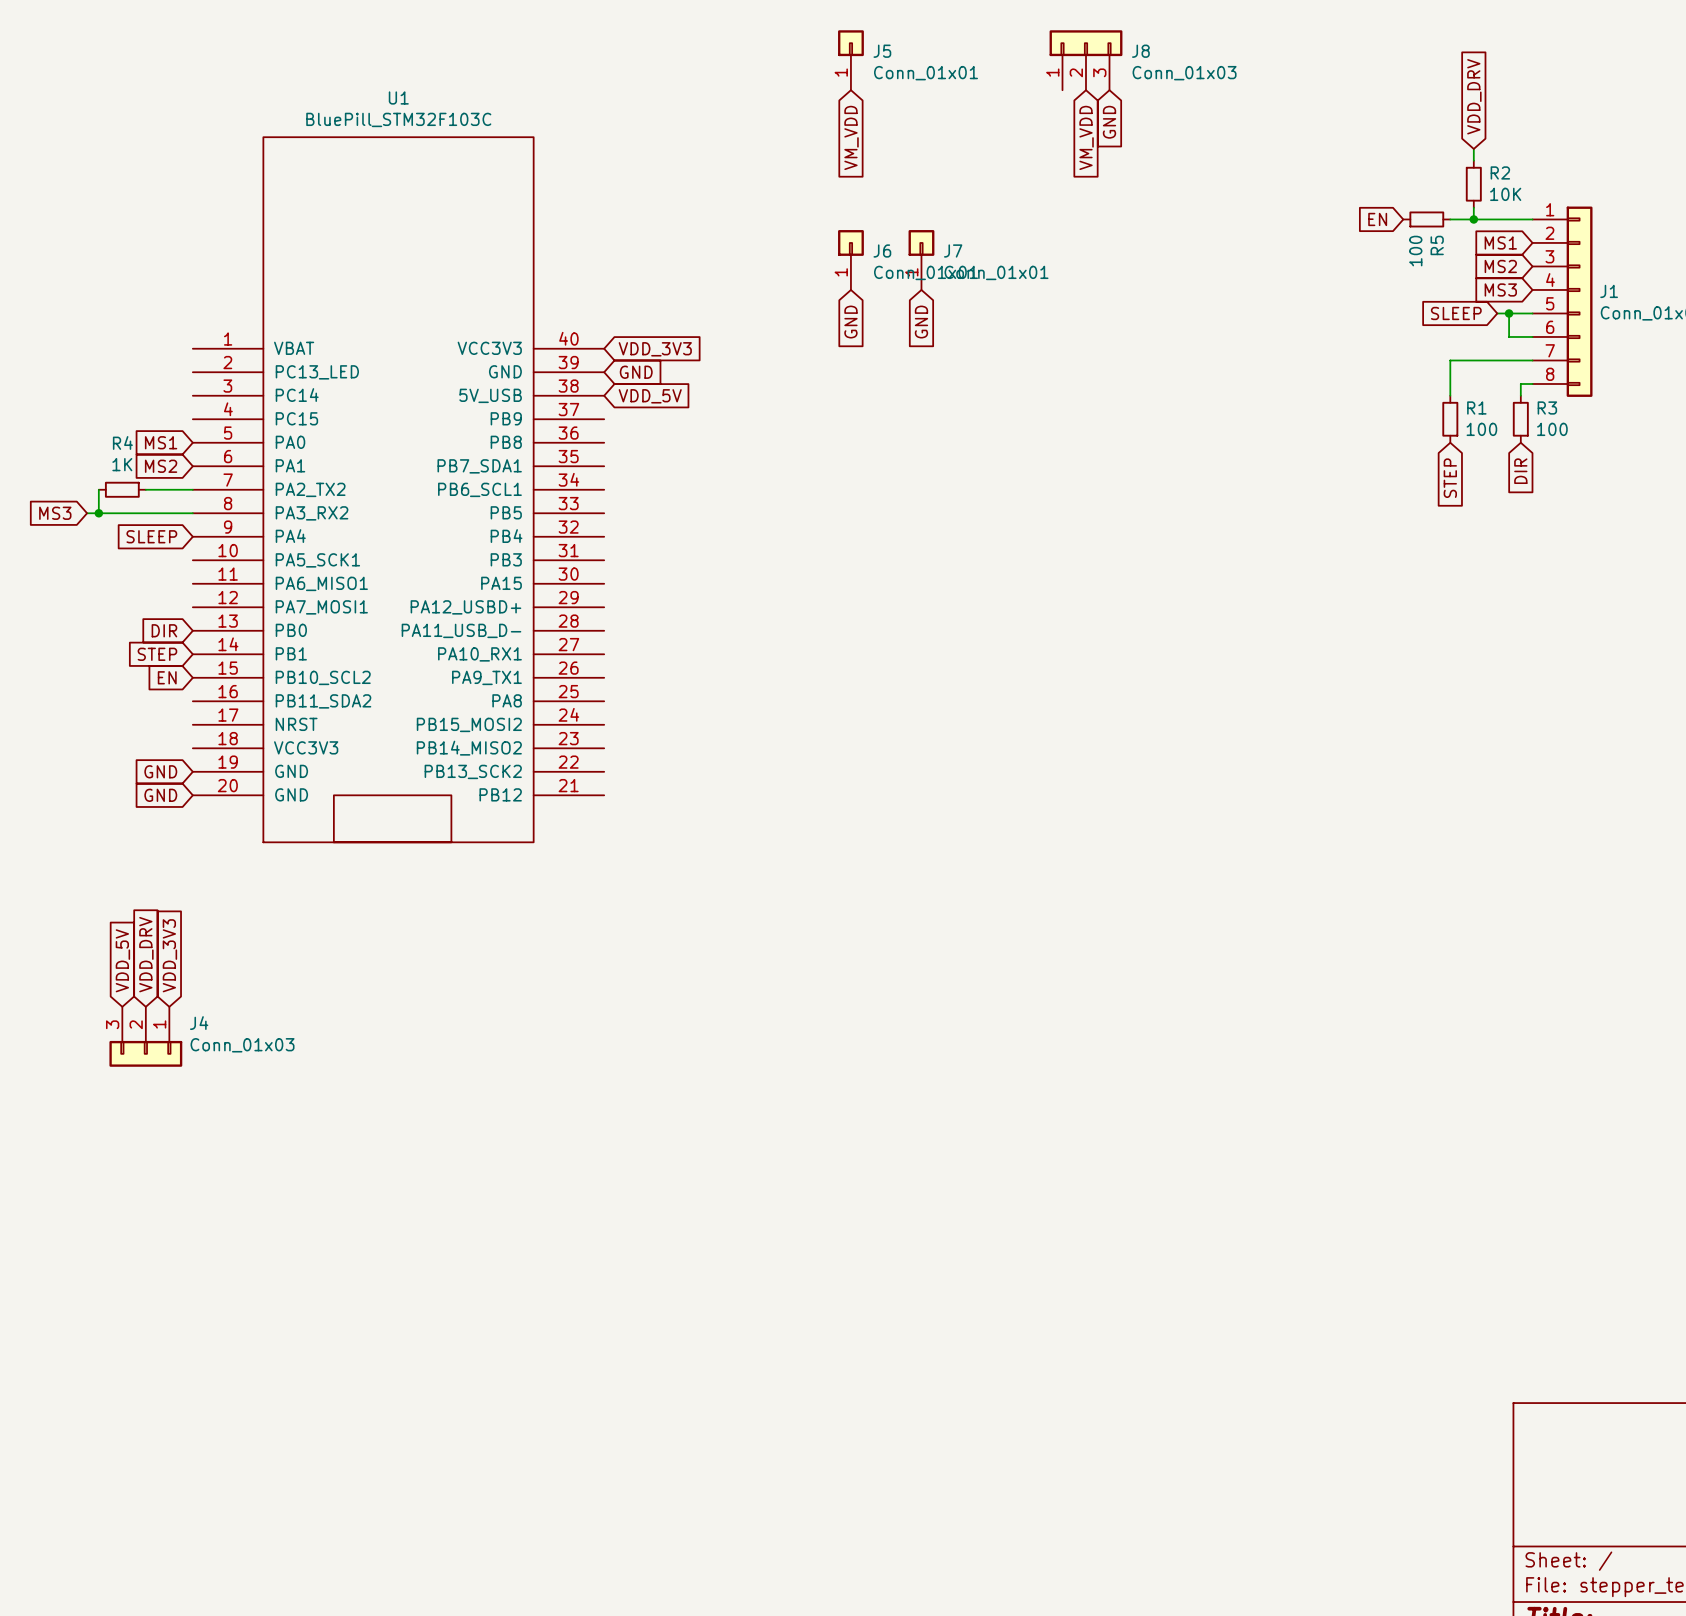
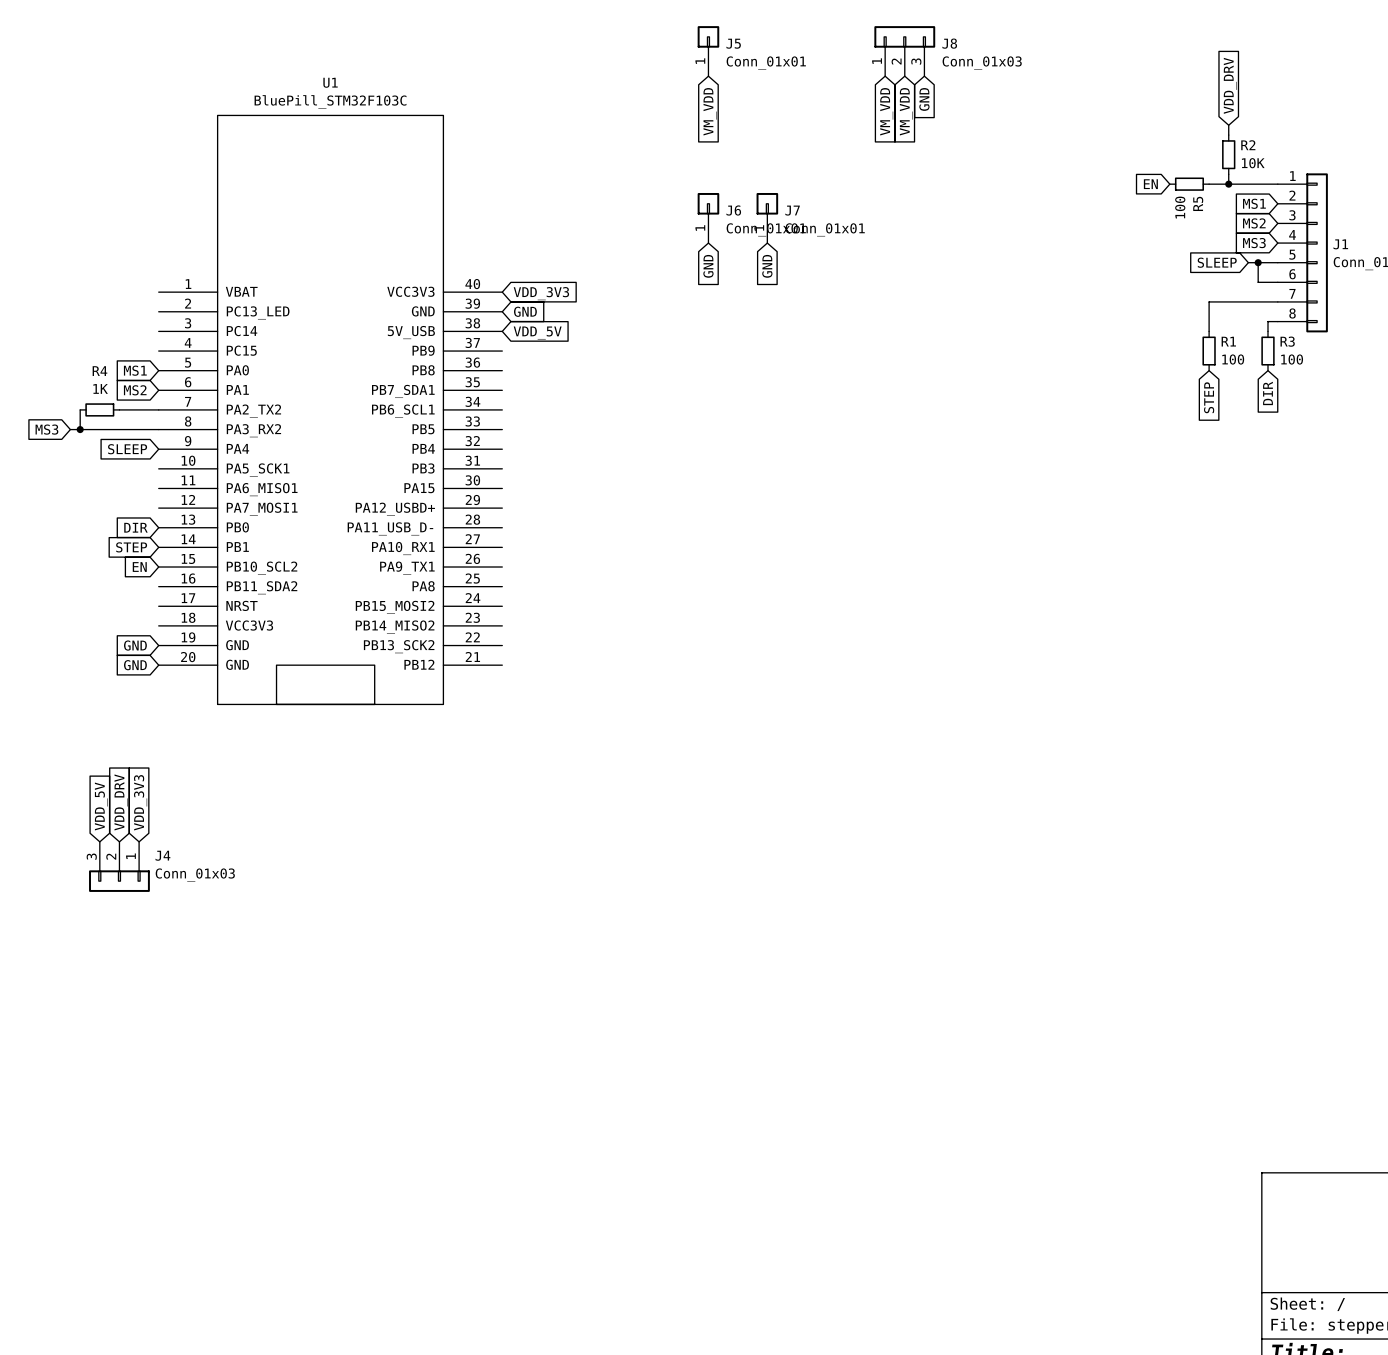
global label: none -> VM_VDD (886, 111)

